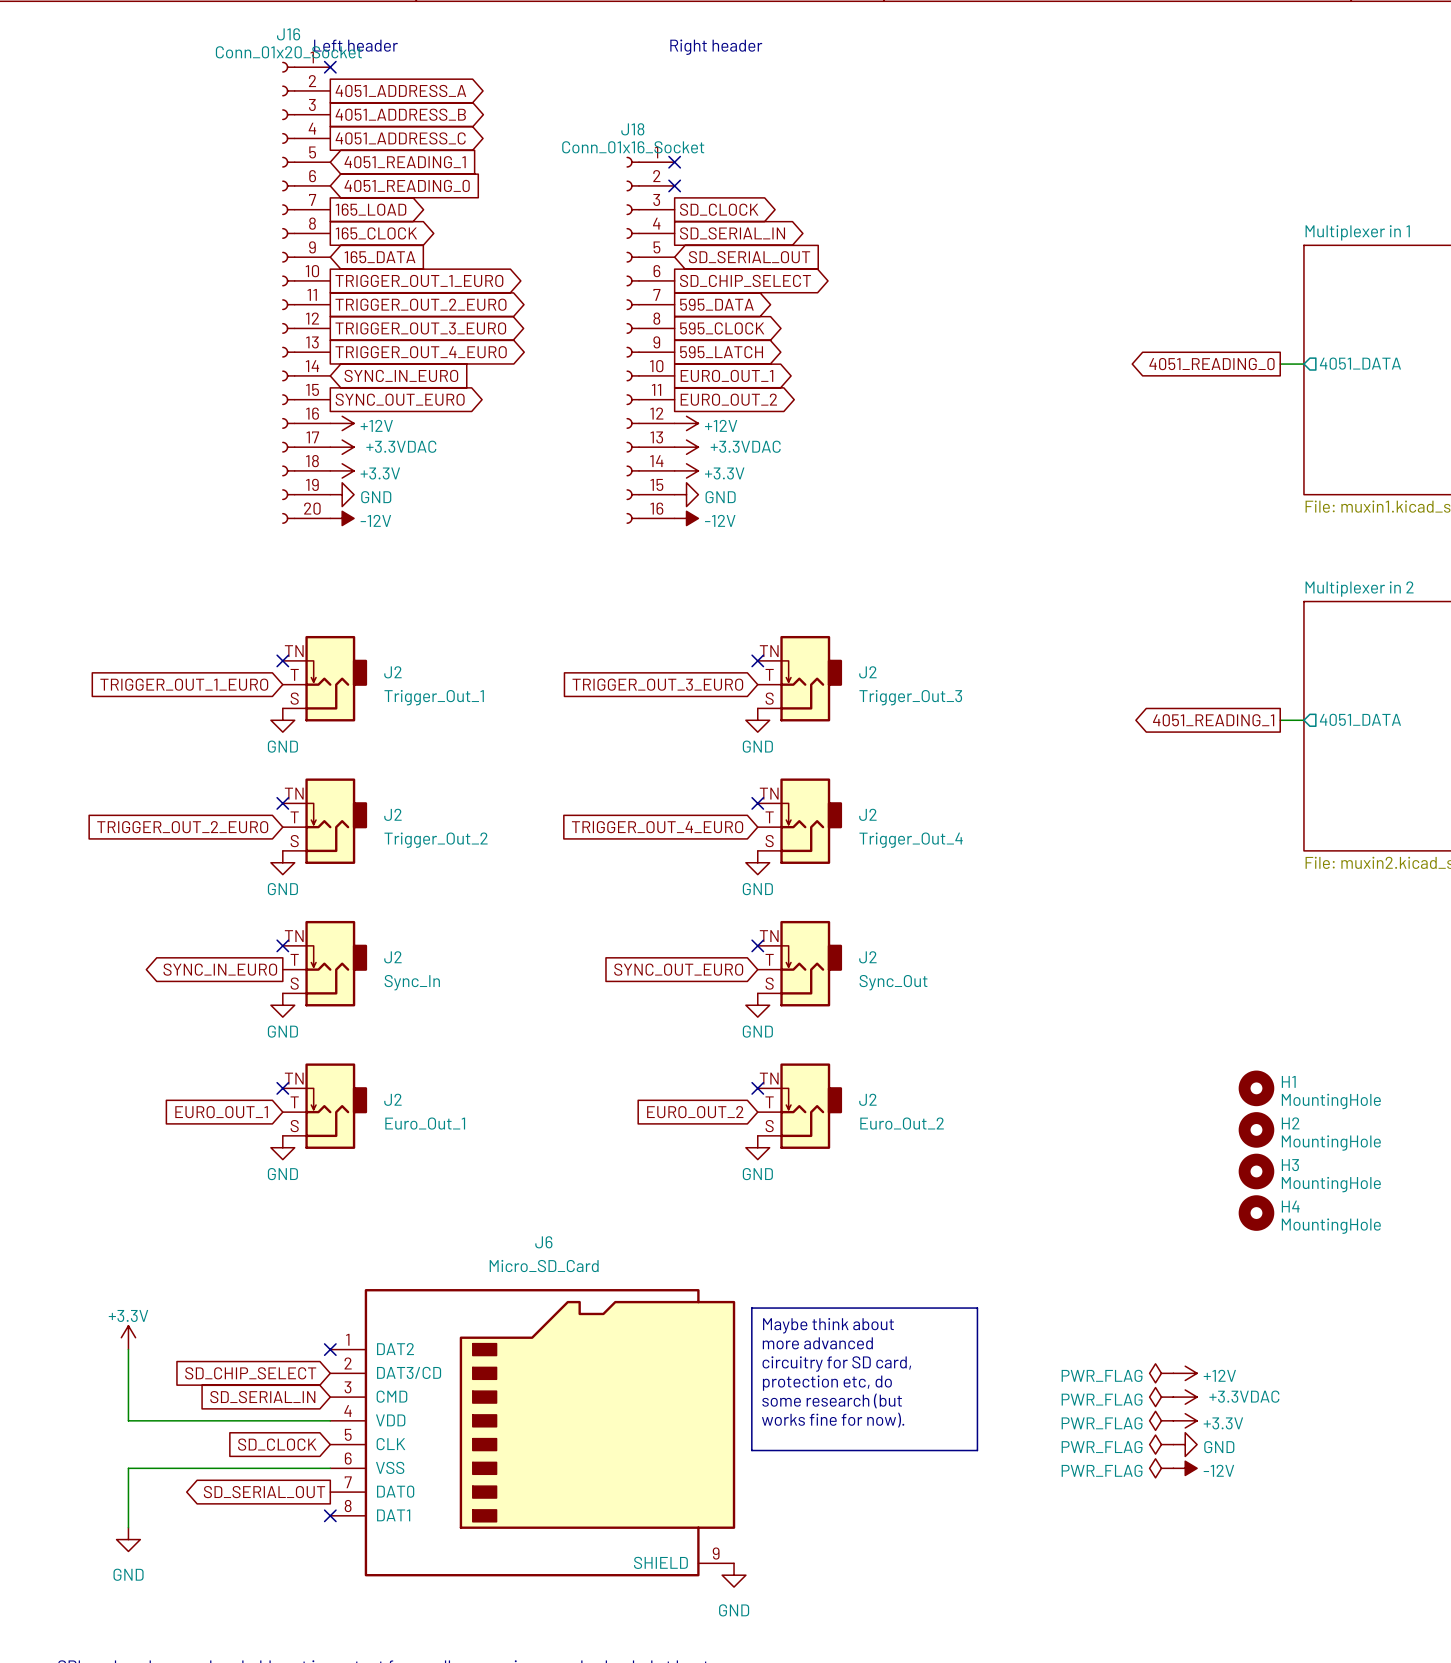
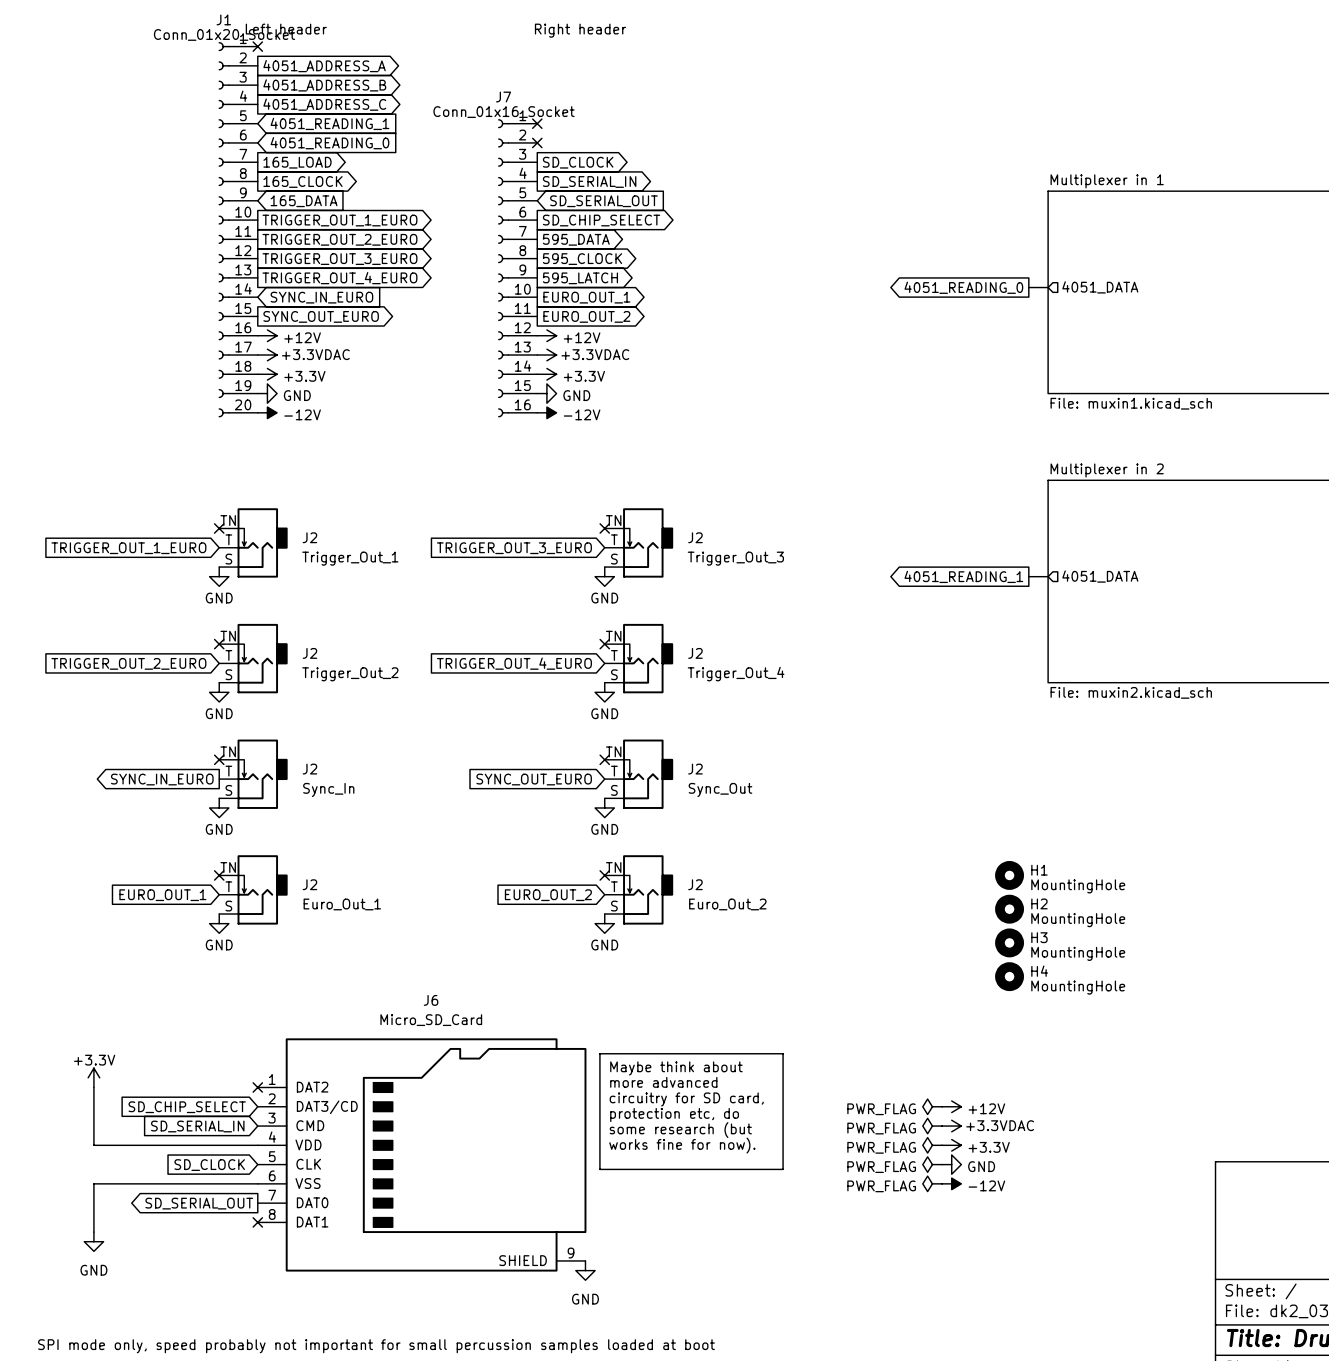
J16 name: J16 (288, 34) -> J1 (223, 19)
J18 name: J18 (632, 129) -> J7 (503, 97)

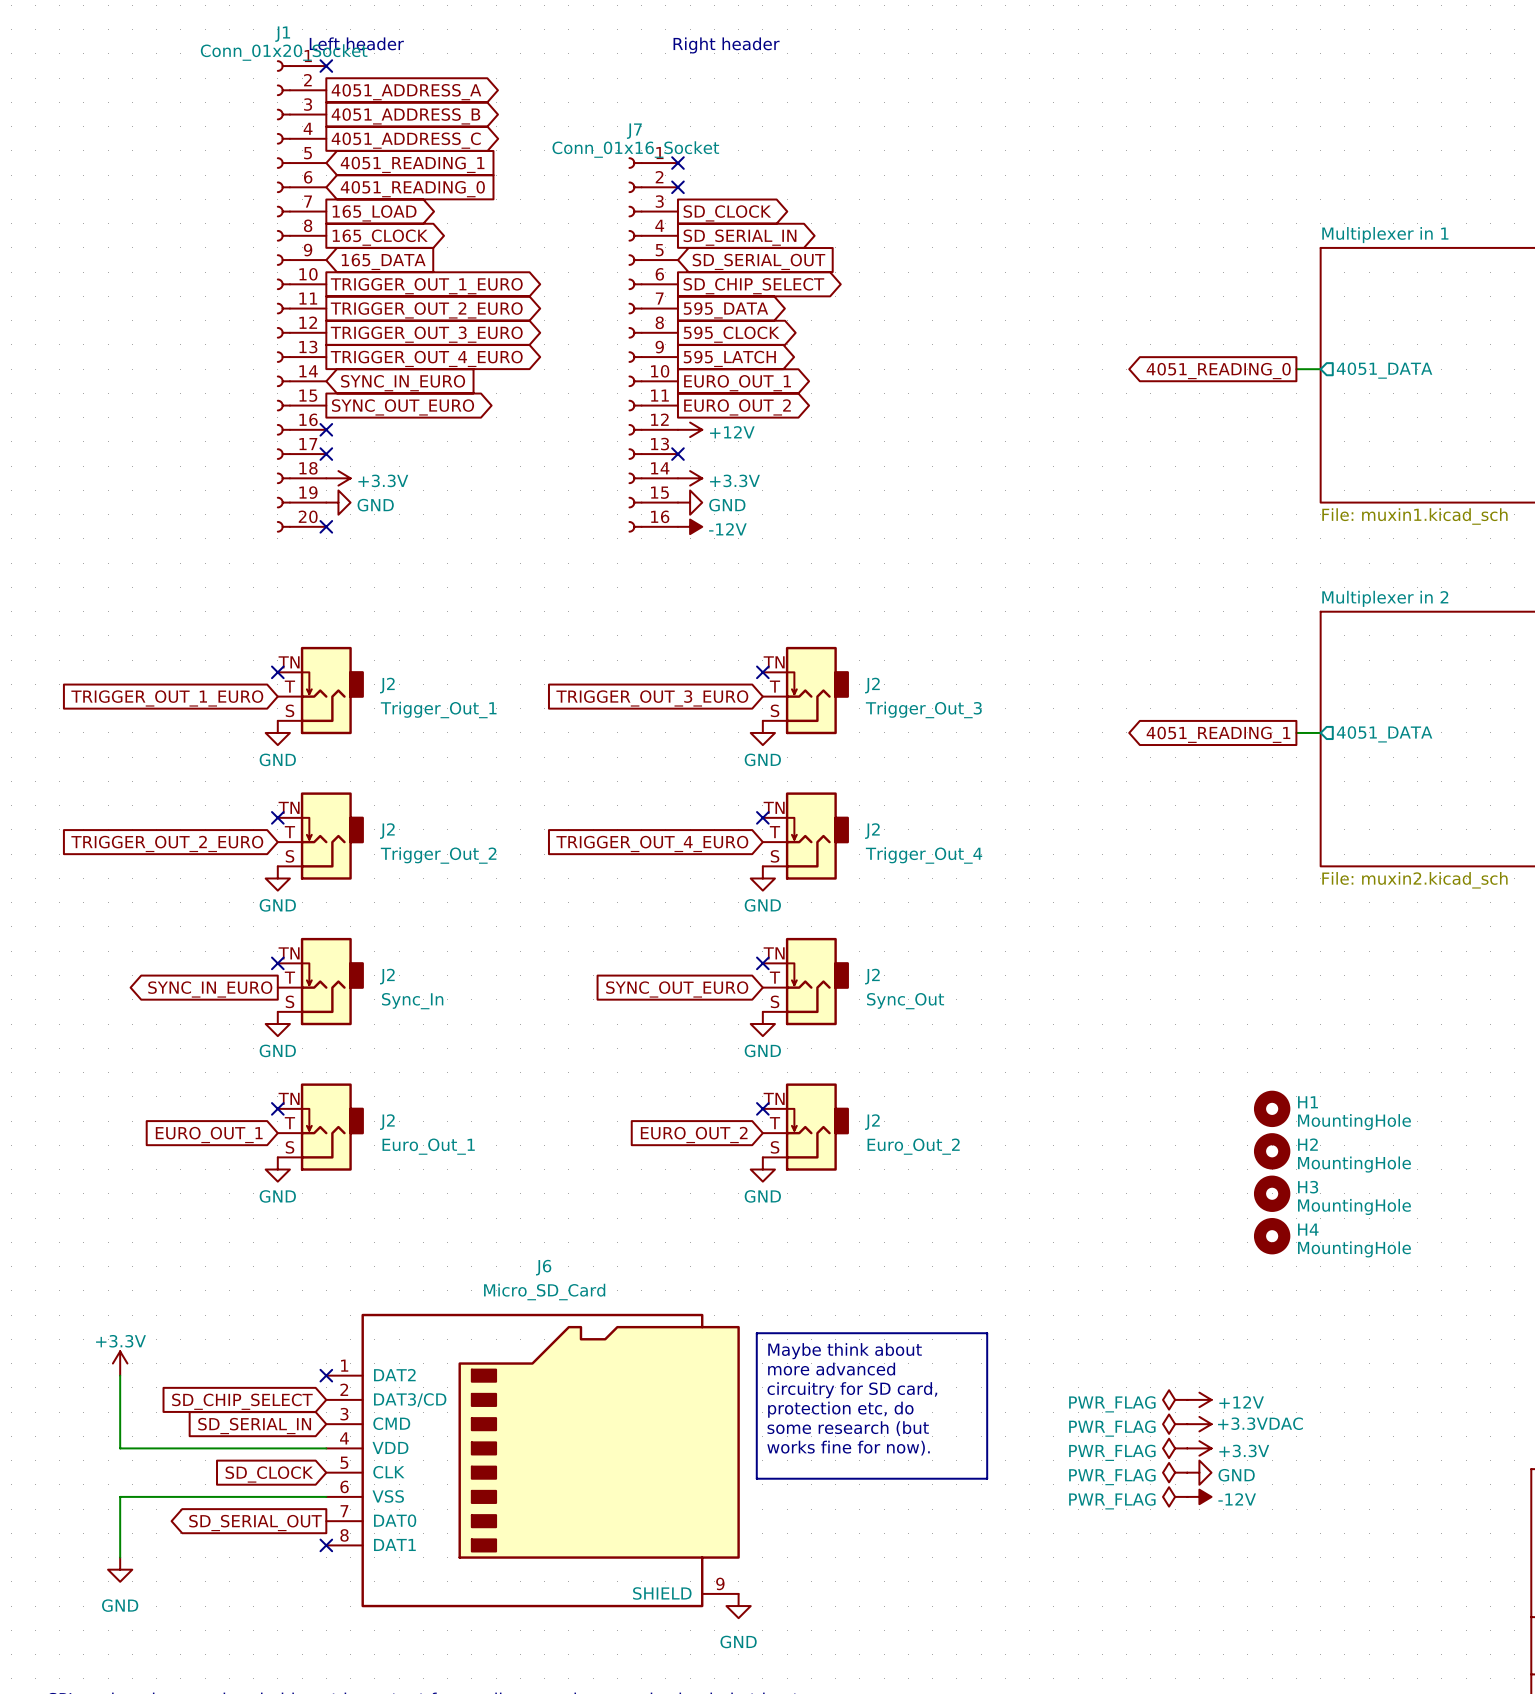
no-connect mark: none -> (326, 429)
power symbol: +12V (267, 335) -> none
no-connect mark: none -> (326, 454)
power symbol: +3.3VDAC (267, 355) -> none
no-connect mark: none -> (677, 454)
power symbol: +3.3VDAC (546, 355) -> none
no-connect mark: none -> (326, 526)
power symbol: -12V (267, 412) -> none

